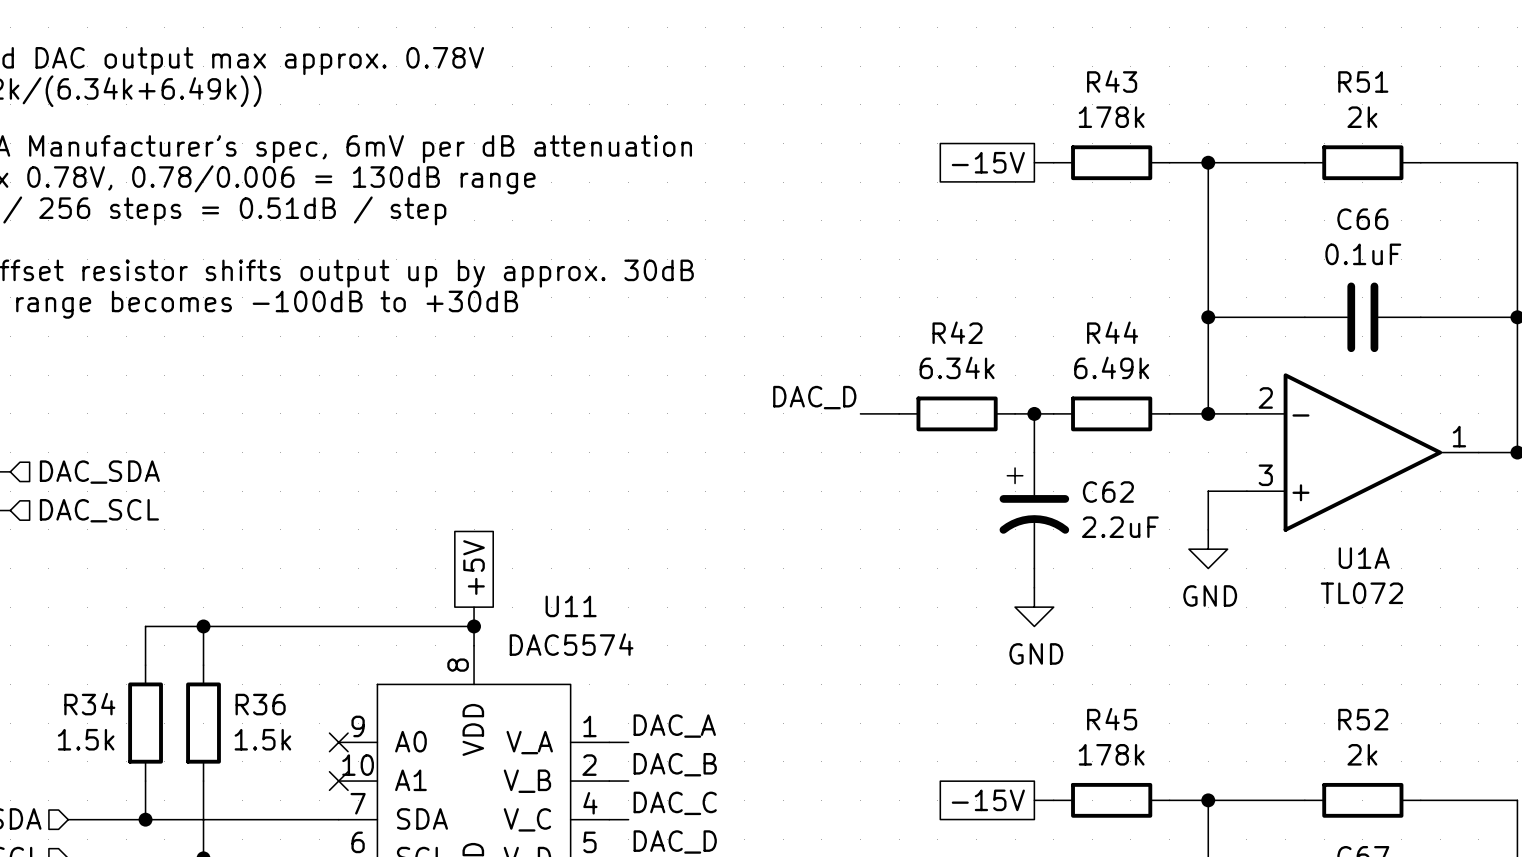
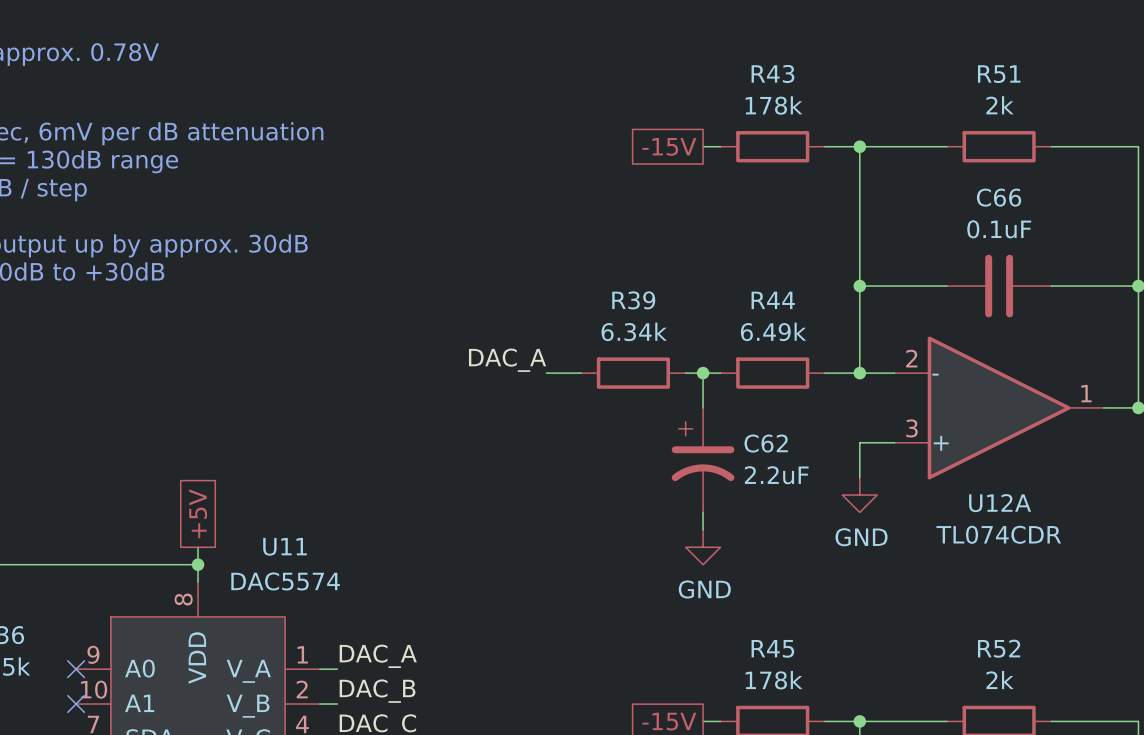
R42 name: R42 (957, 332) -> R39 (633, 300)
label: DAC_D (814, 397) -> DAC_A (507, 360)
U1A name: U1A (1364, 558) -> U12A (1000, 503)
U1A value: TL072 (1361, 593) -> TL074CDR (998, 534)

